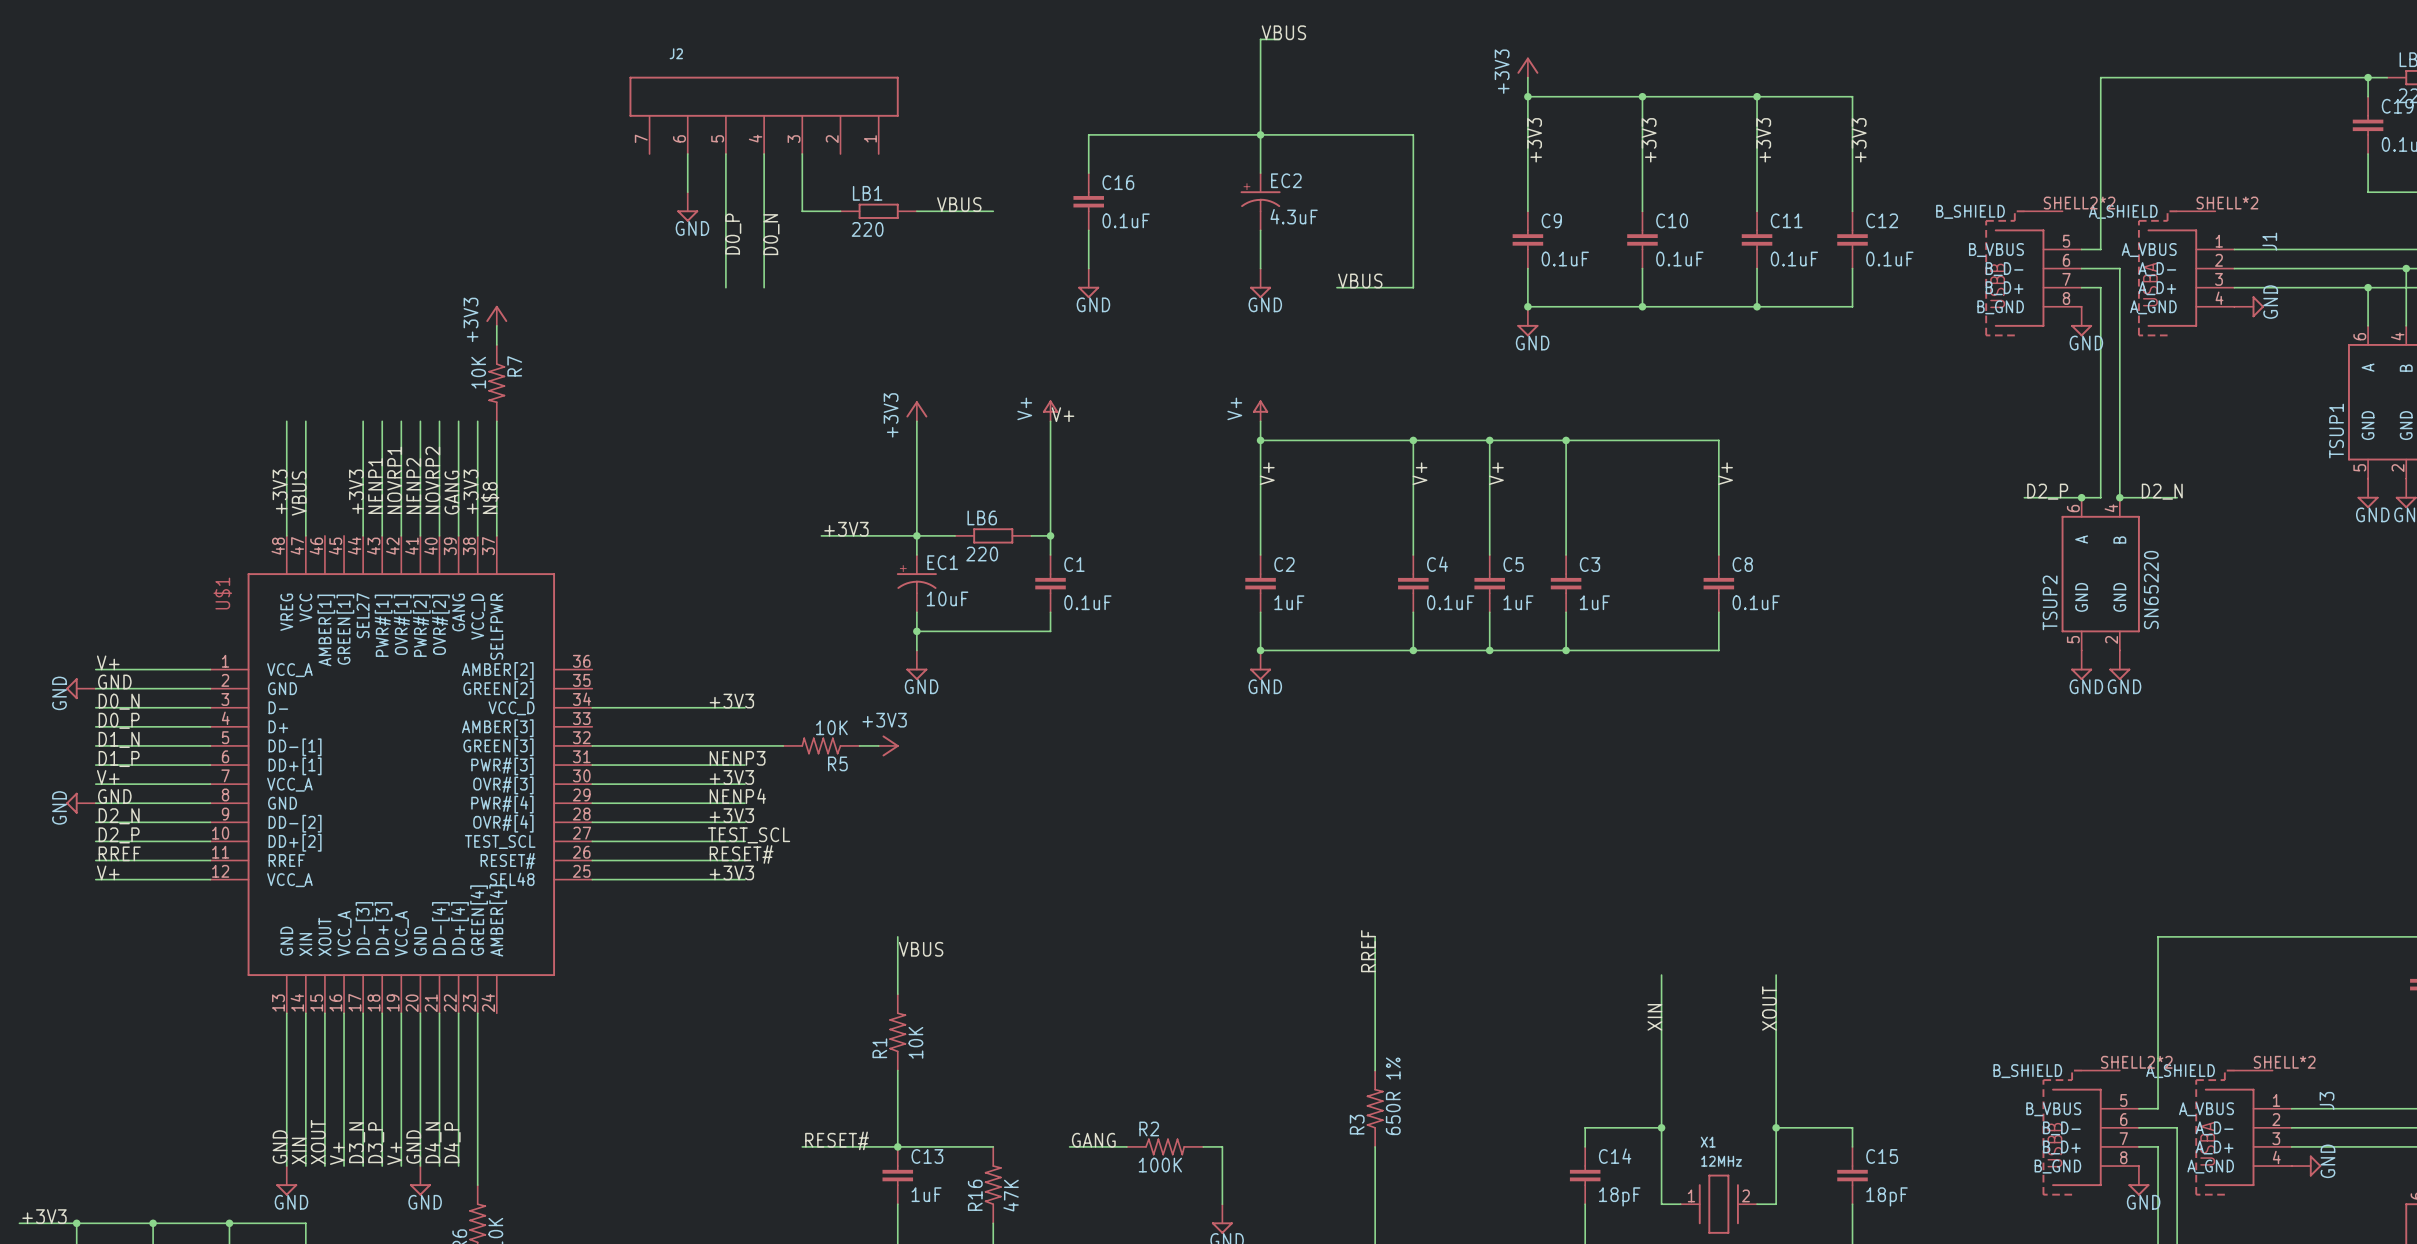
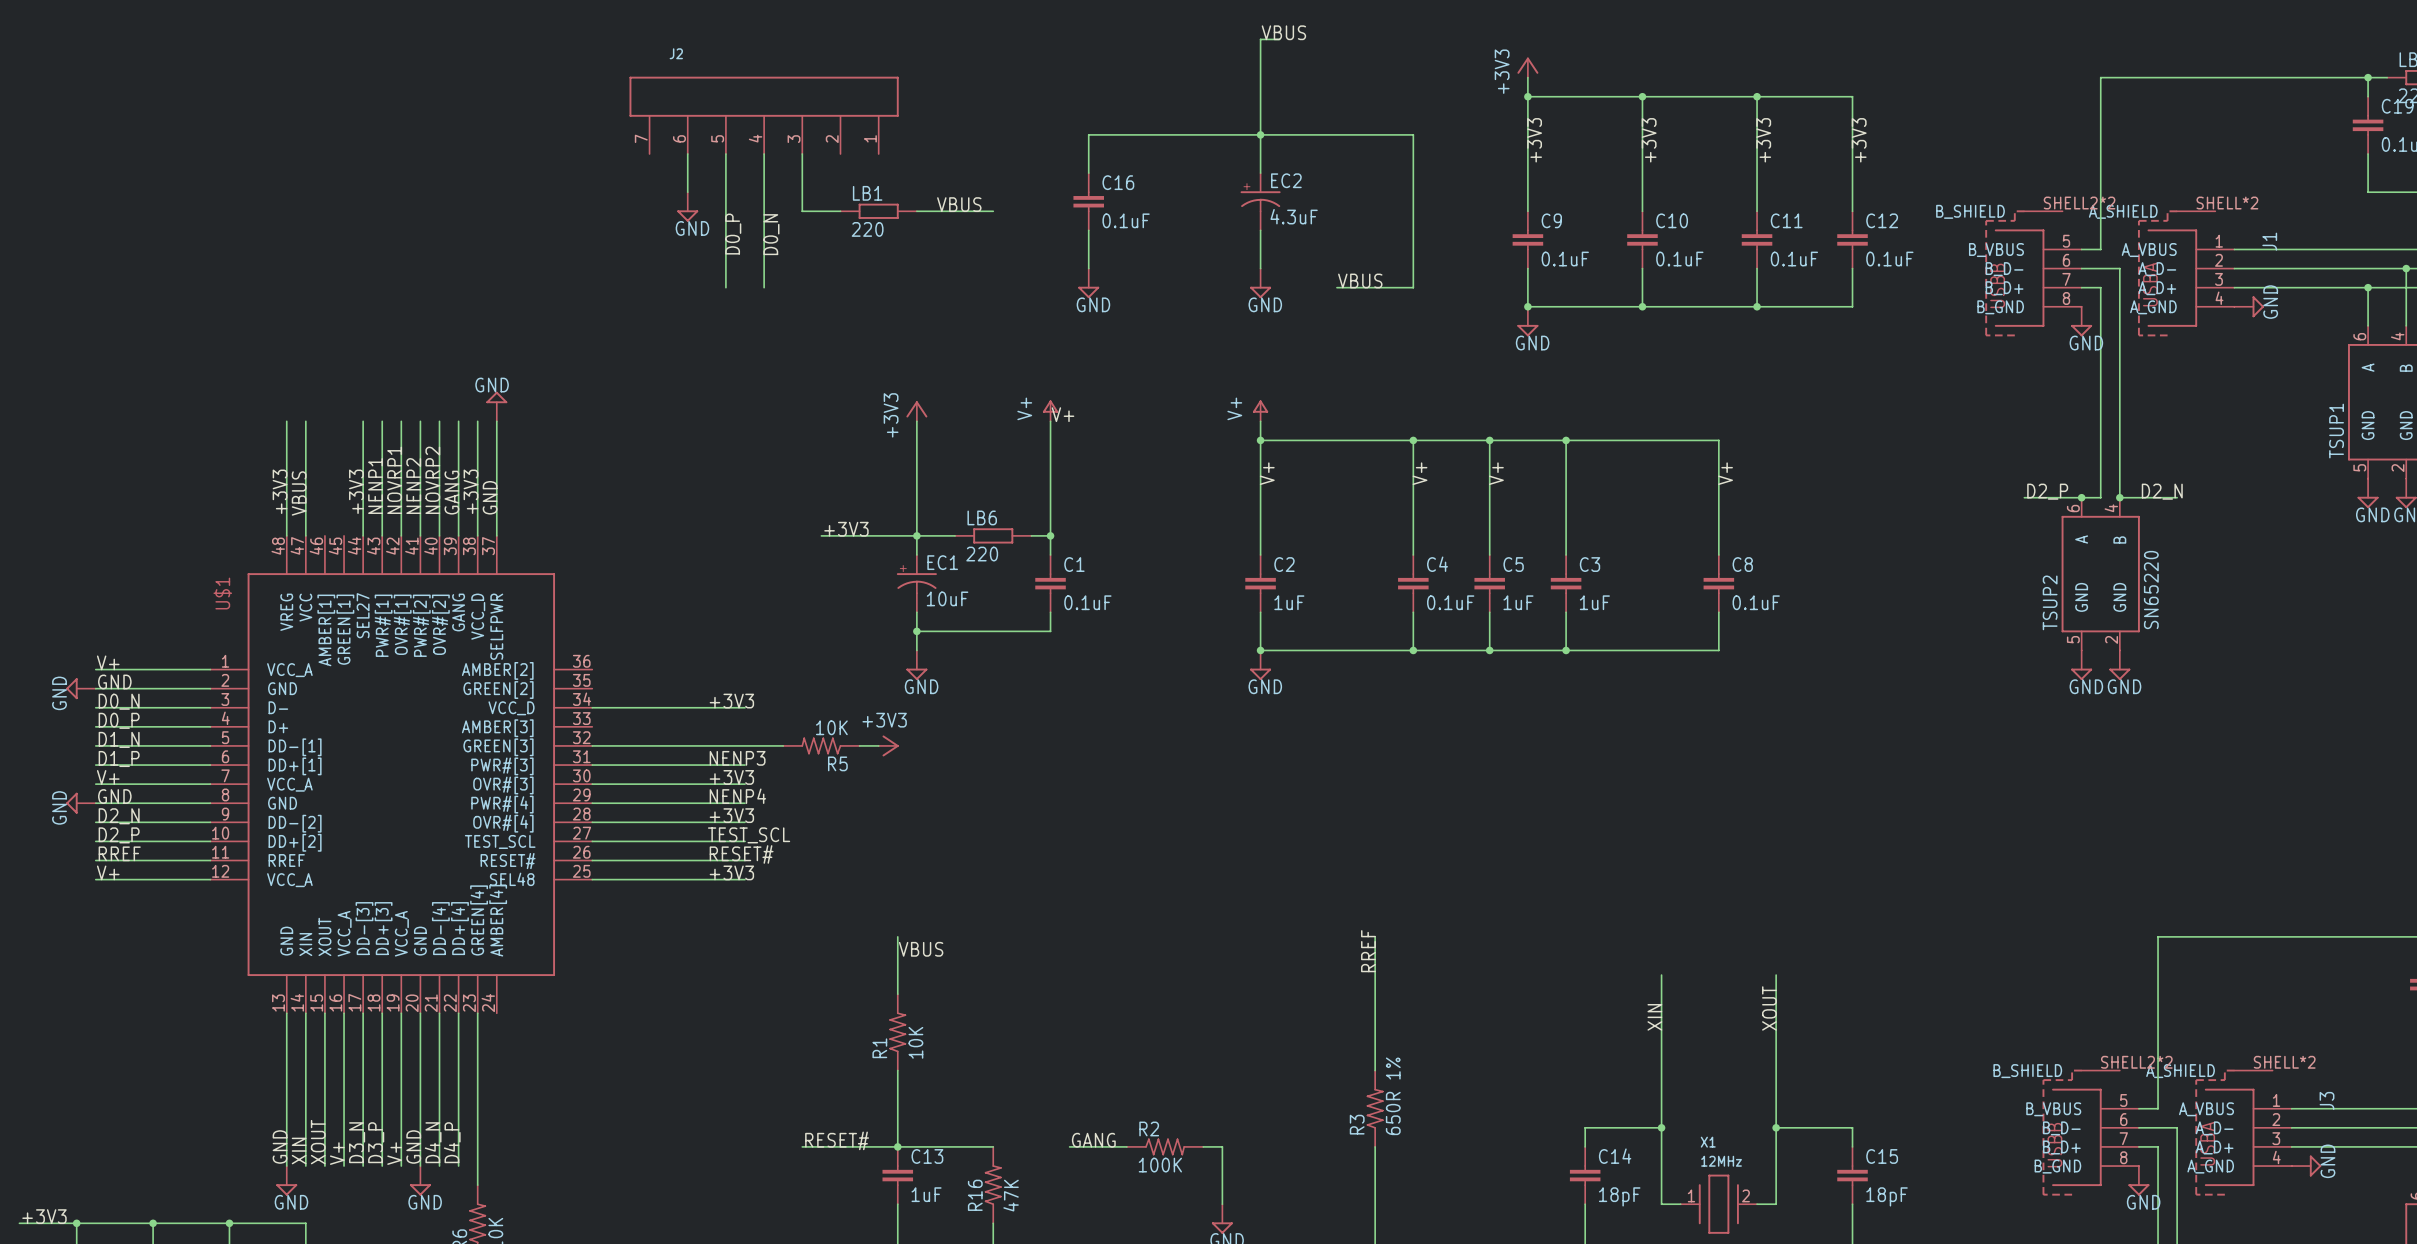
power symbol: +3V3 (496, 315) -> none
wire: (496, 325) (496, 344) -> none
R7: 10K (496, 383) -> none
power symbol: none -> GND (496, 406)
label: N$8 (490, 498) -> GND (490, 497)

